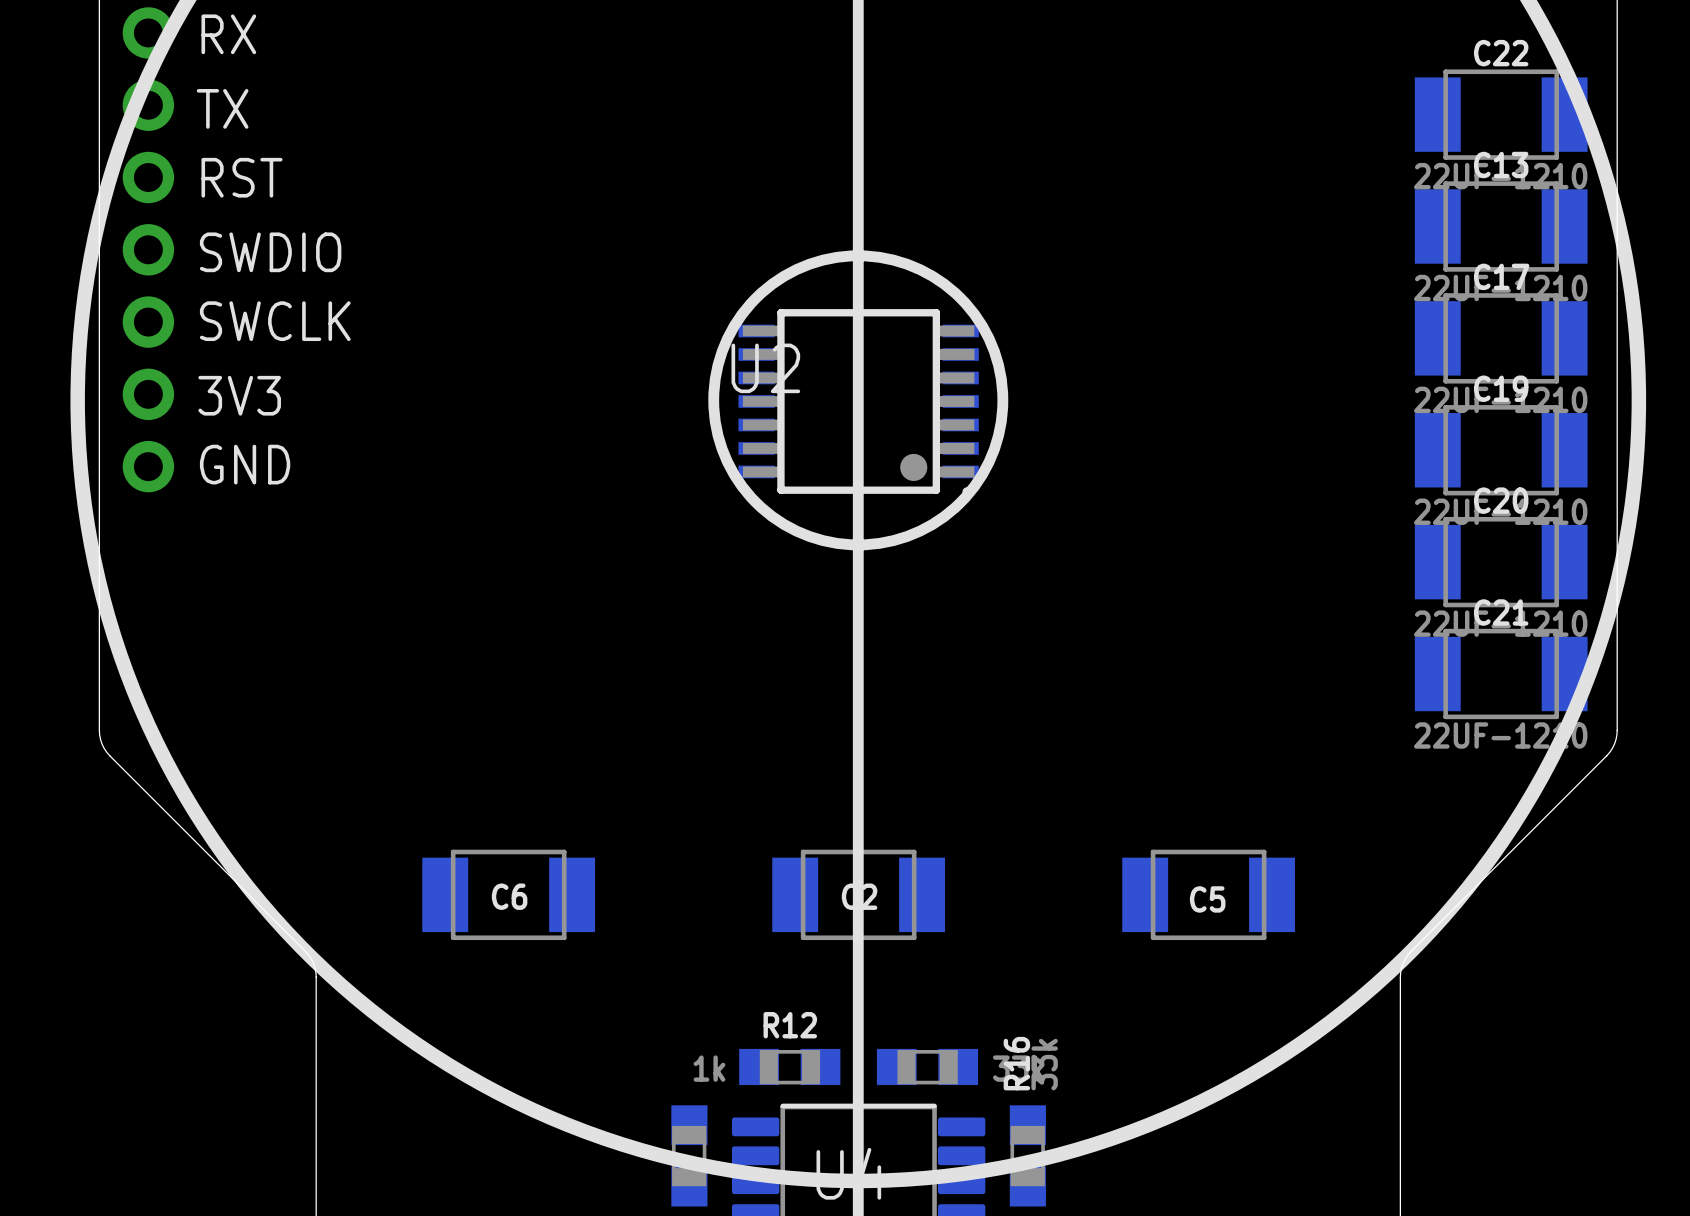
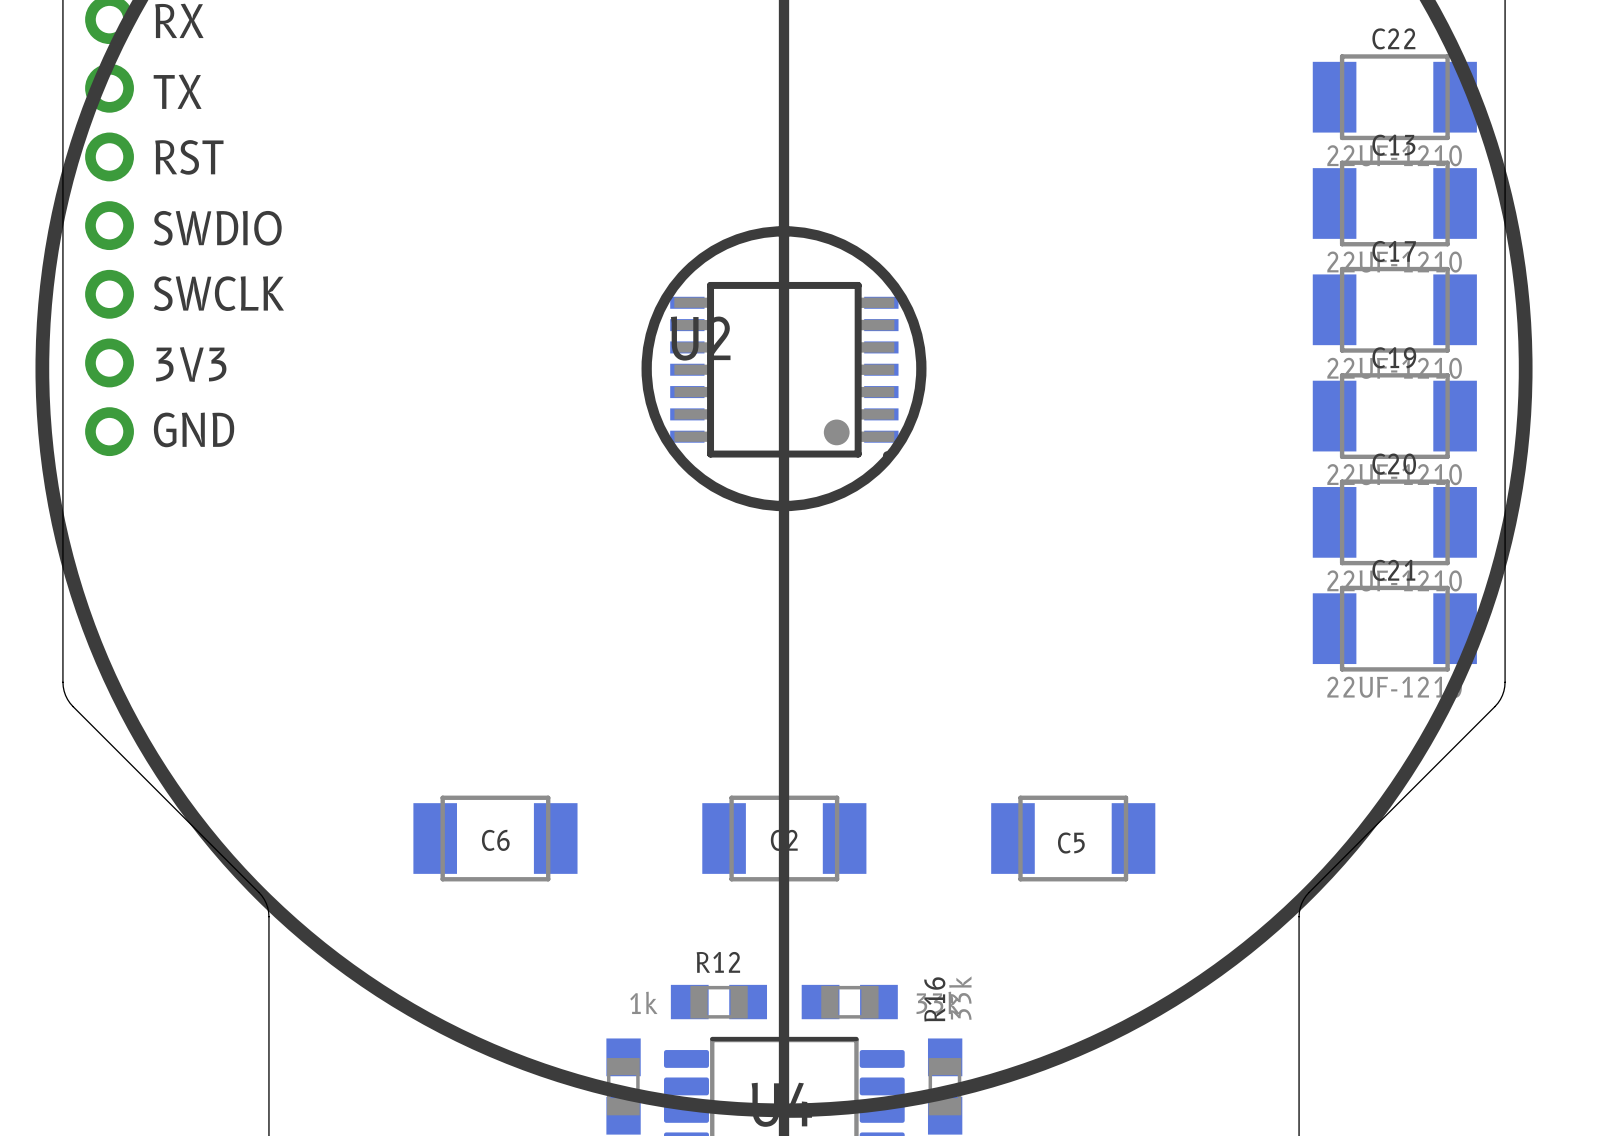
C6 position: (508, 894) -> (495, 838)
C5 position: (1208, 894) -> (1073, 838)

